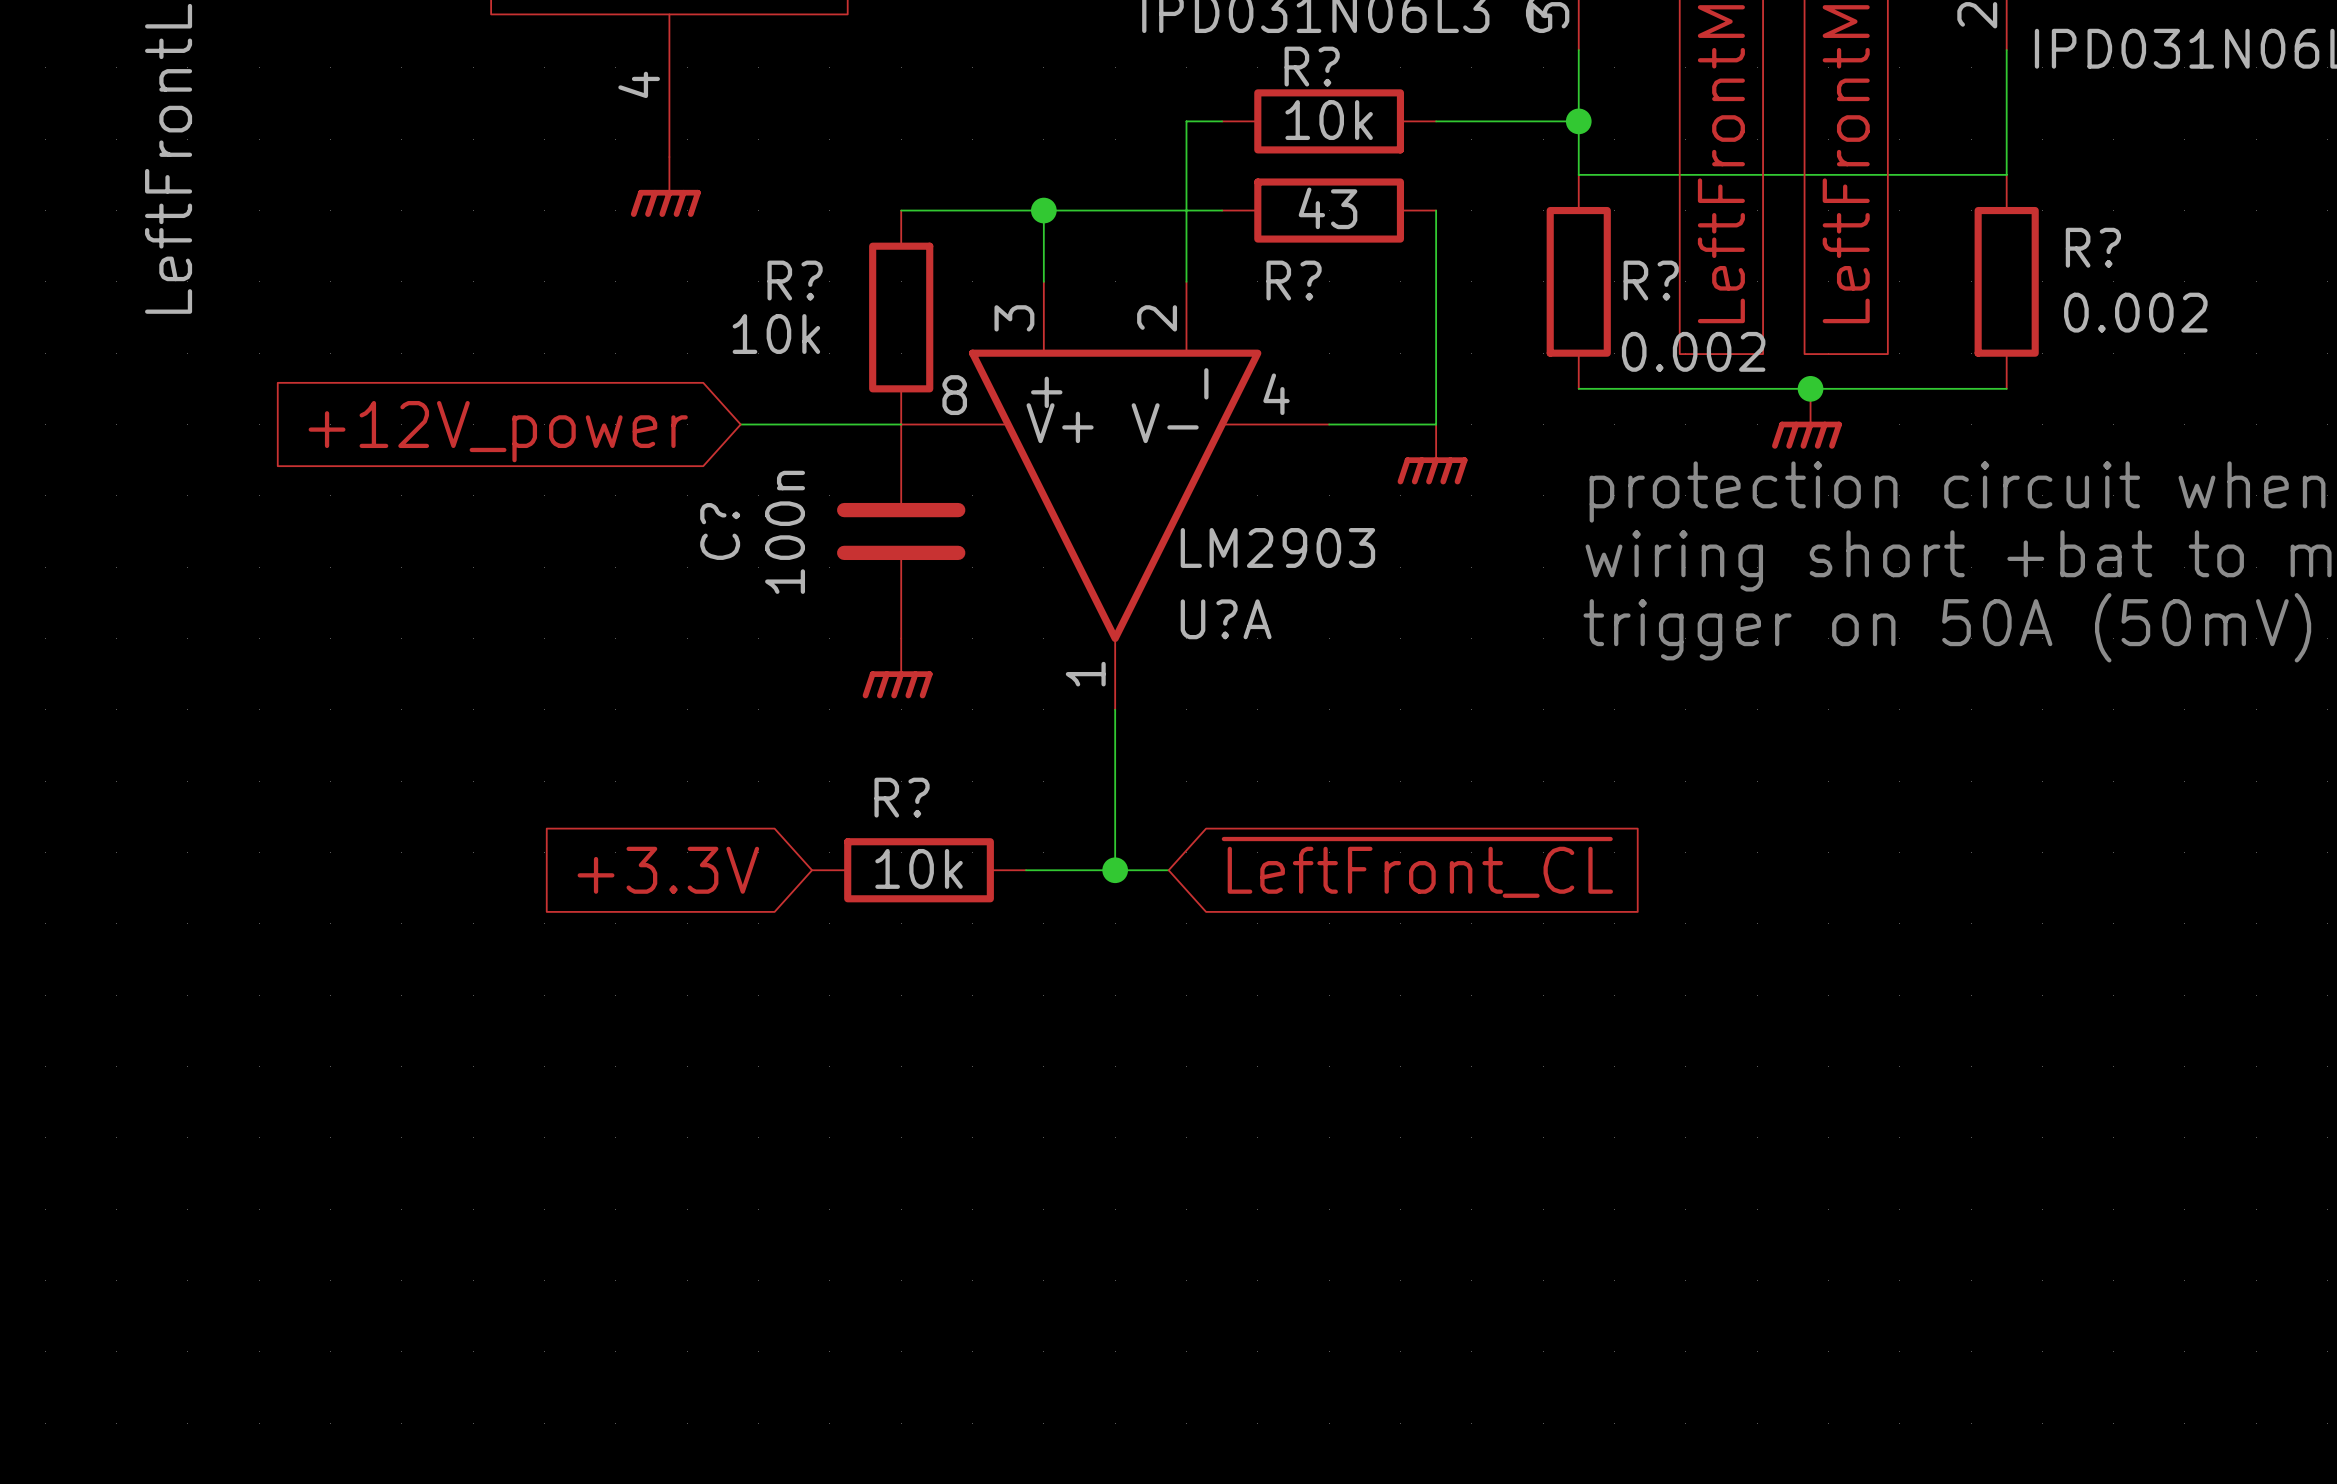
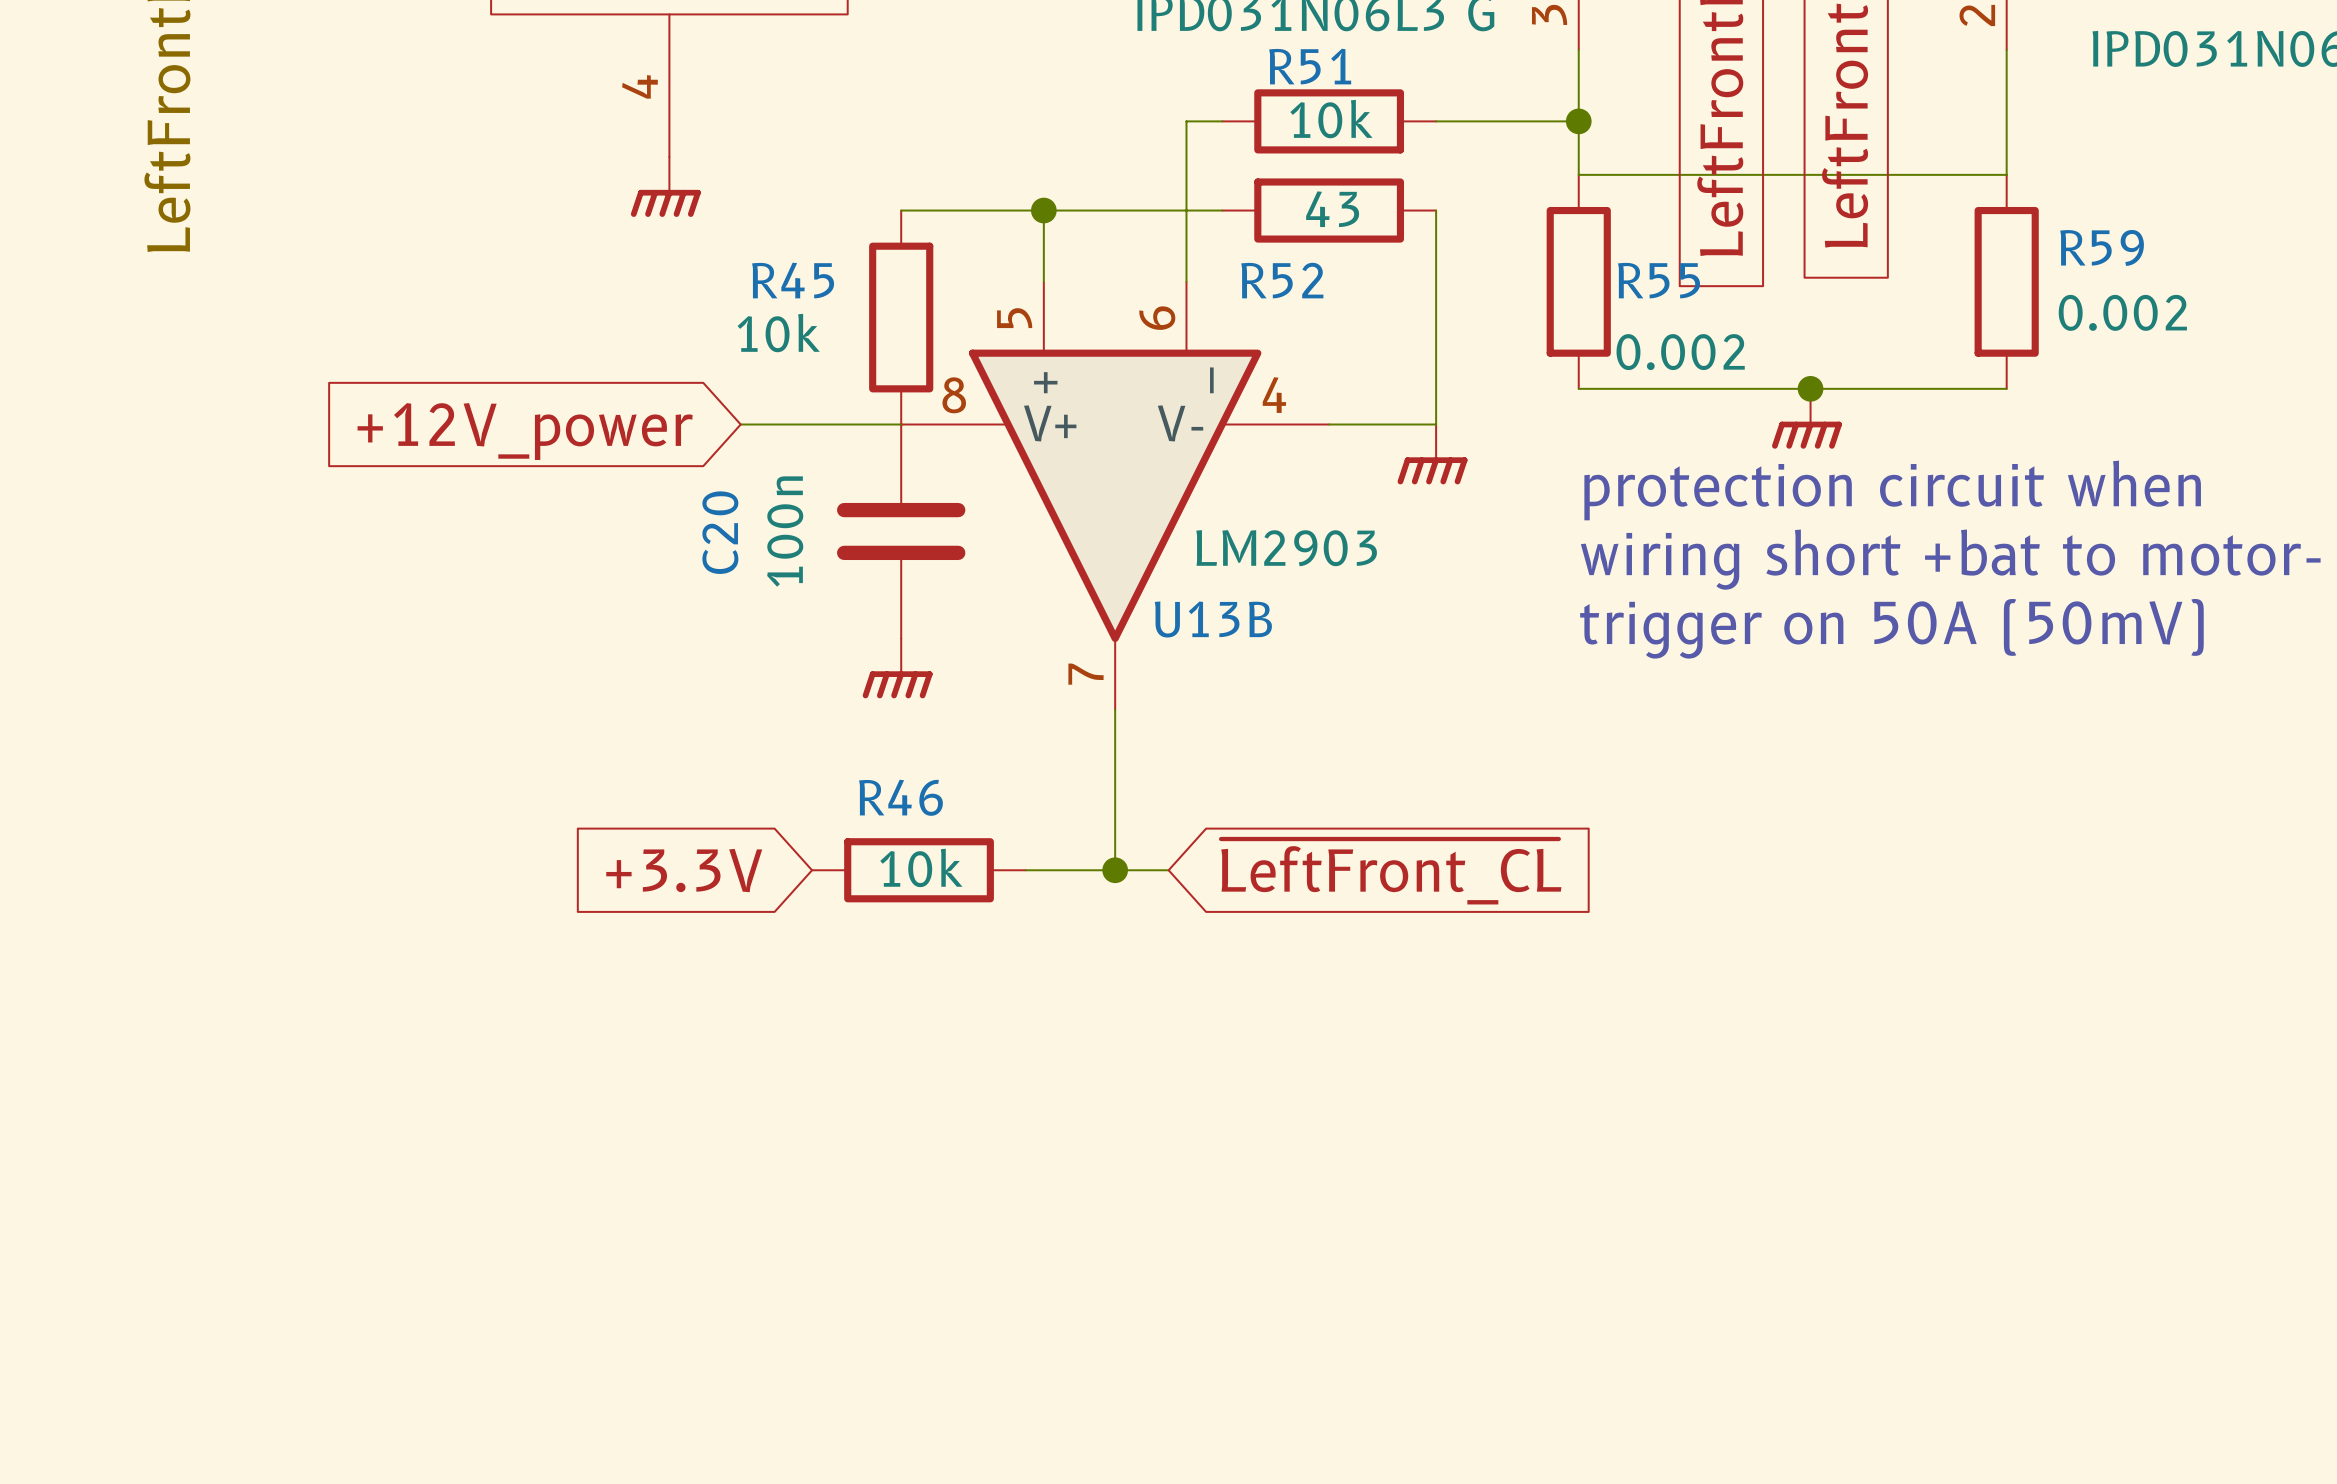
R? name: R? (1312, 66) -> R51 (1310, 66)
R? name: R? (2093, 247) -> R59 (2102, 247)
R? name: R? (795, 280) -> R45 (793, 280)
R? name: R? (1294, 280) -> R52 (1282, 280)
R? name: R? (1651, 280) -> R55 (1659, 280)
U?A pin number: 3 (1014, 318) -> 5 (1014, 318)
U?A pin number: 2 (1157, 318) -> 6 (1157, 318)
C? name: C? (720, 531) -> C20 (720, 532)
U?A name: U?A (1226, 619) -> U13B (1213, 619)
U?A pin number: 1 (1085, 674) -> 7 (1085, 674)
R? name: R? (902, 797) -> R46 (900, 797)

